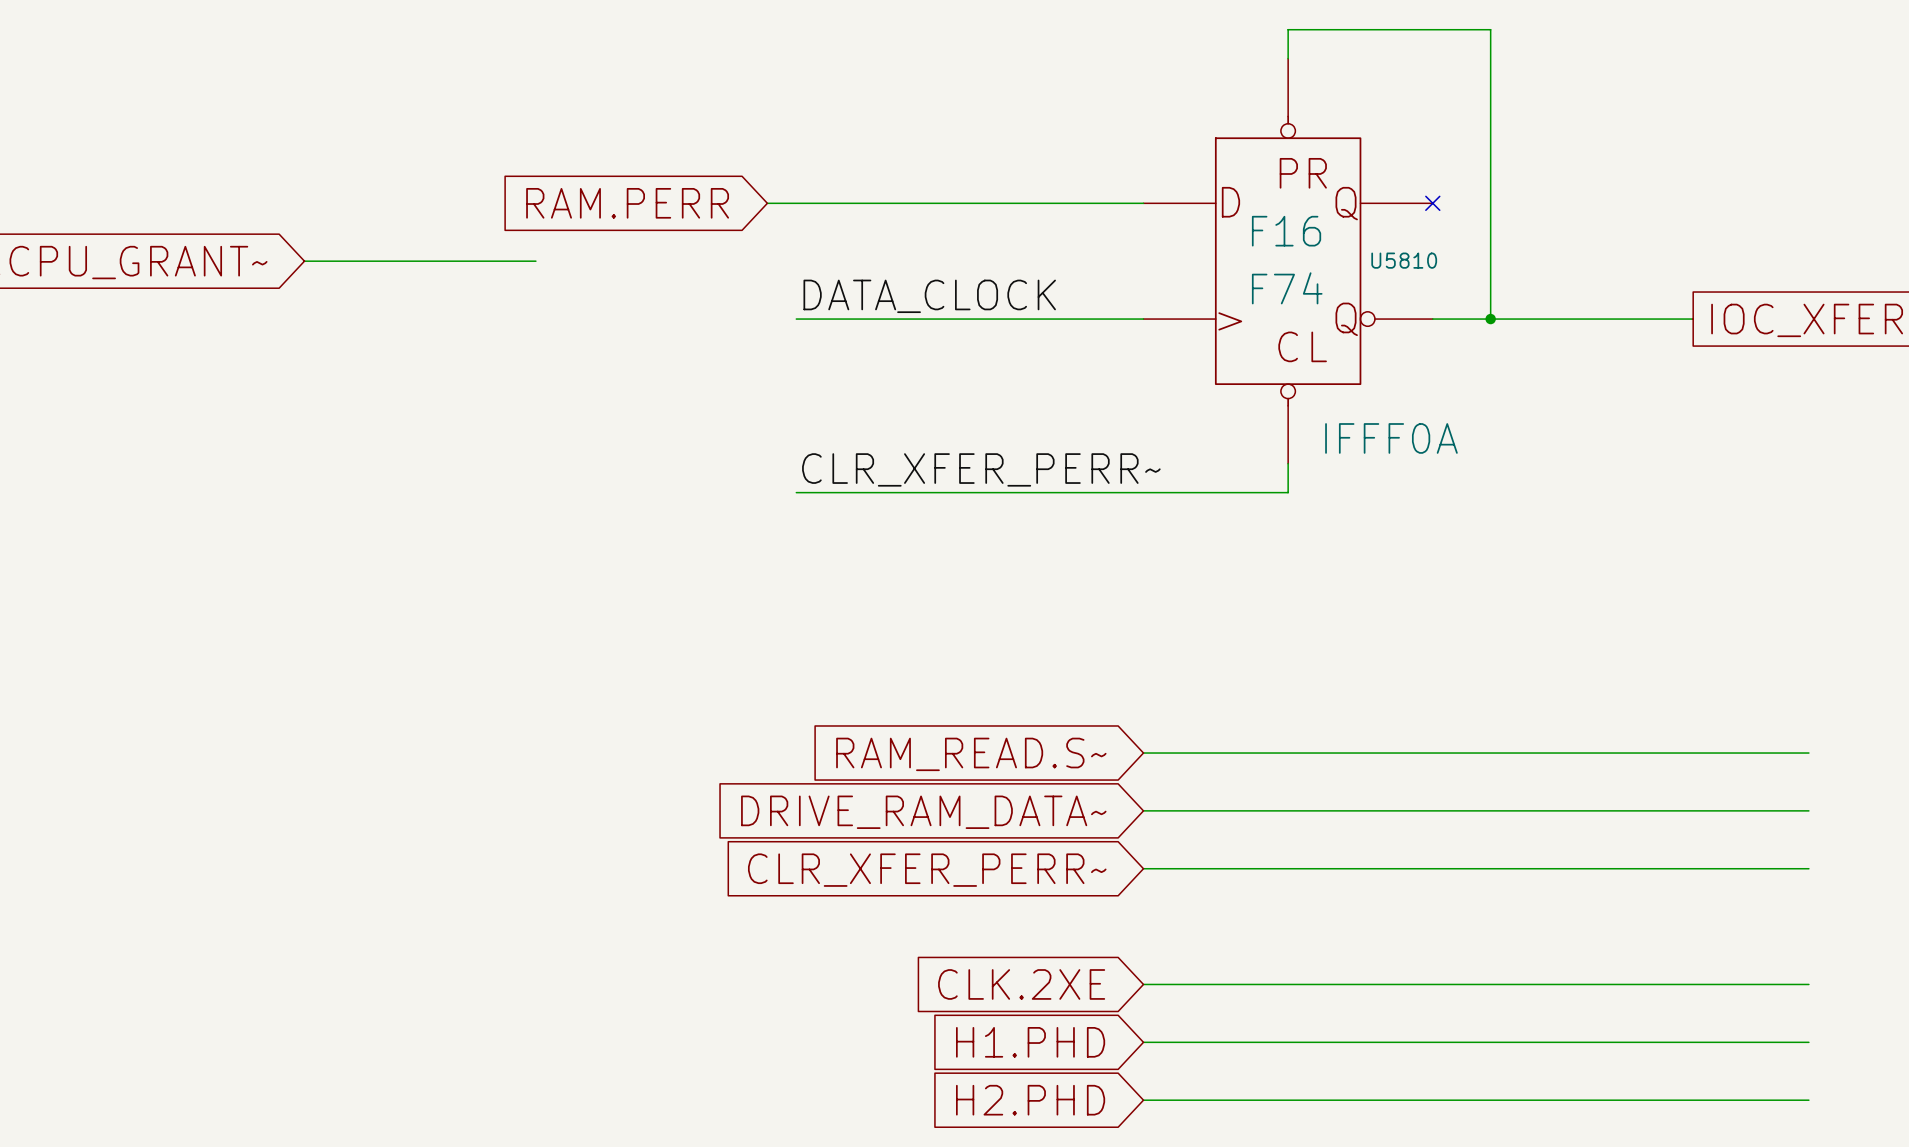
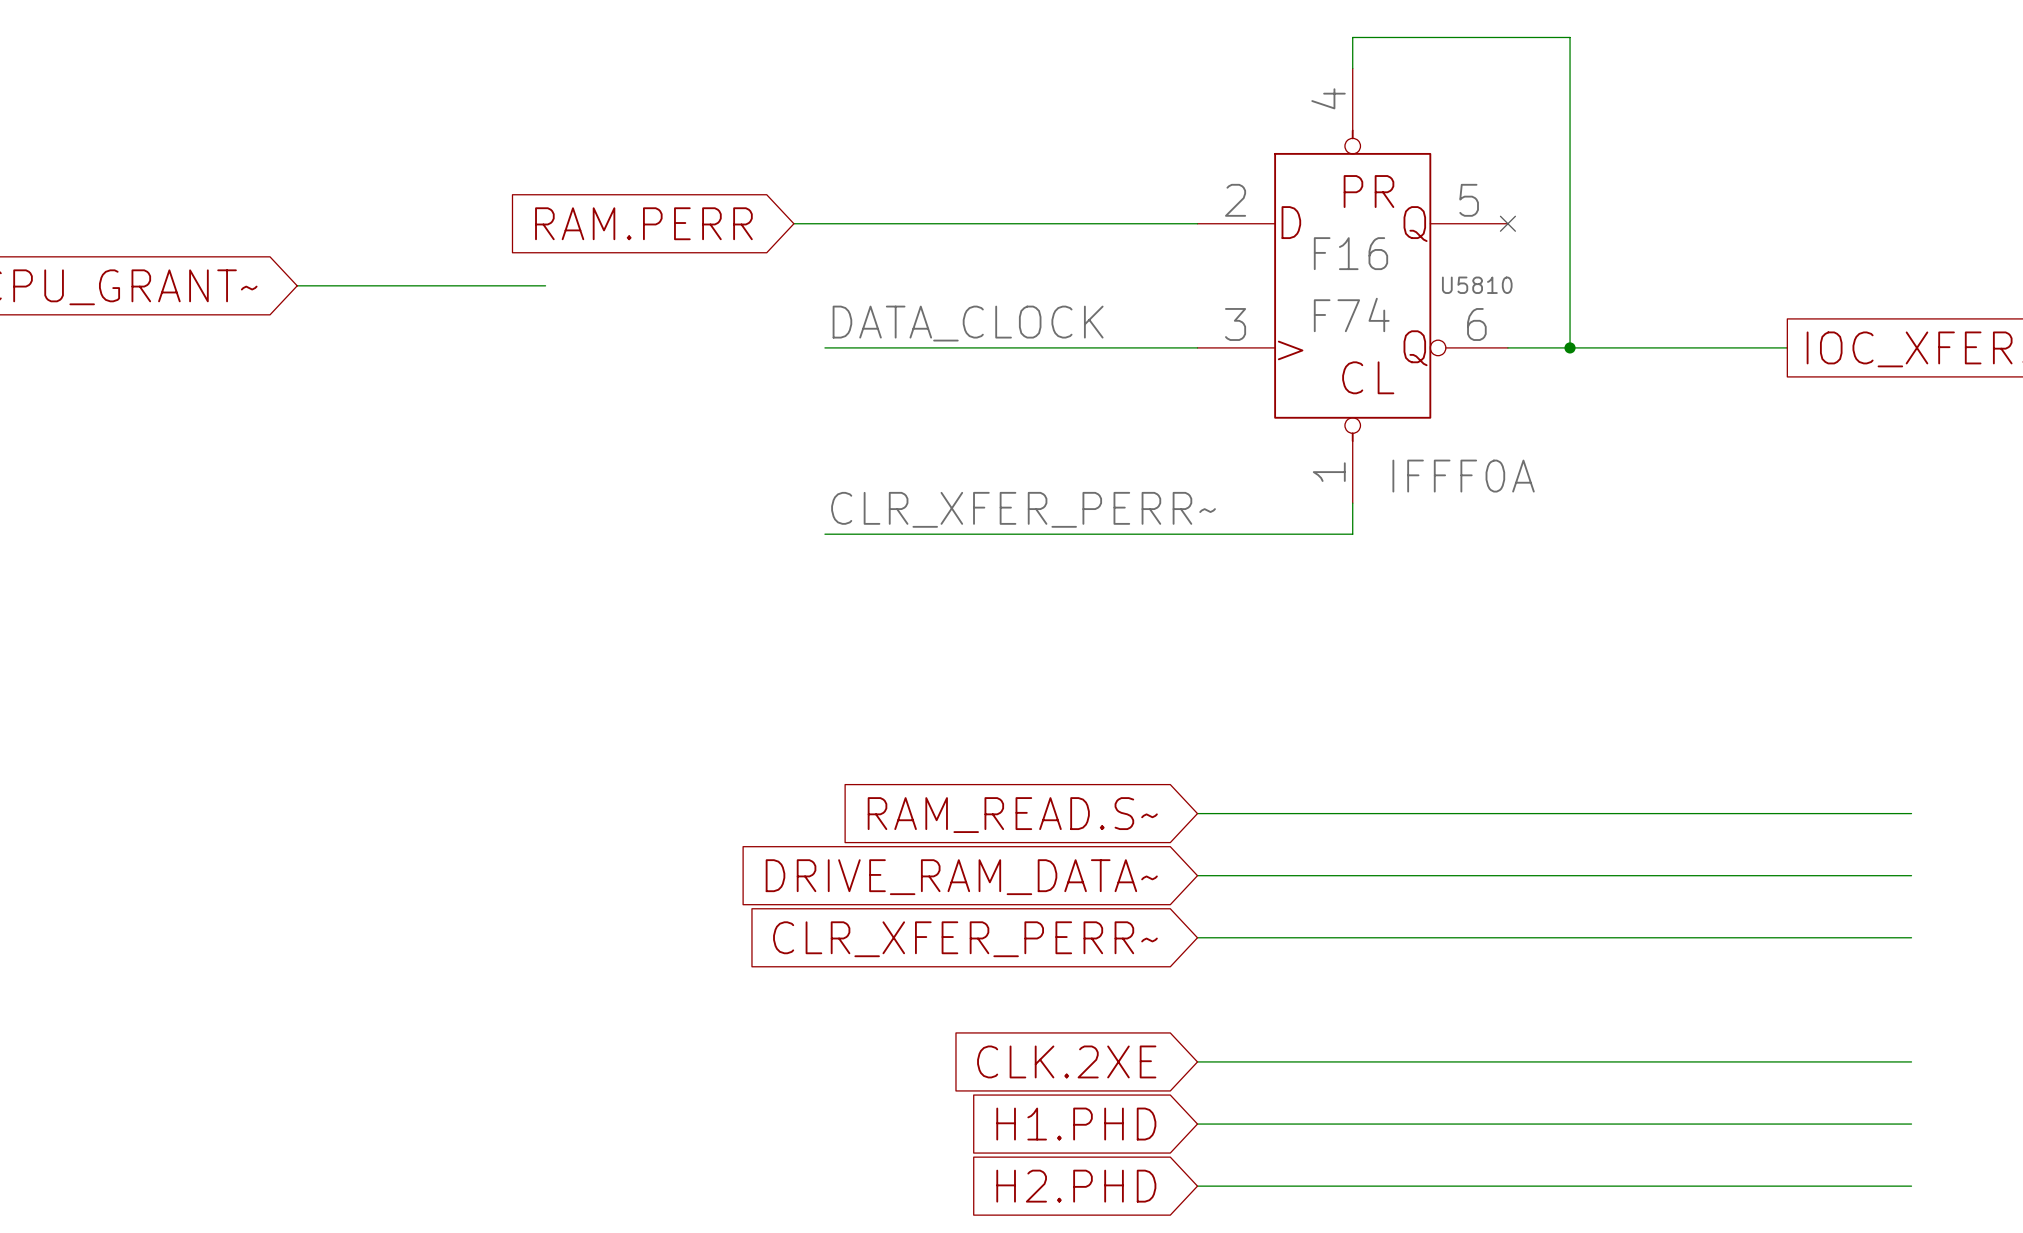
U5810 pin number: none -> 4 (1328, 98)
U5810 pin number: none -> 2 (1235, 200)
U5810 pin number: none -> 5 (1469, 200)
U5810 pin number: none -> 3 (1235, 324)
U5810 pin number: none -> 6 (1476, 324)
U5810 pin number: none -> 1 (1329, 472)

